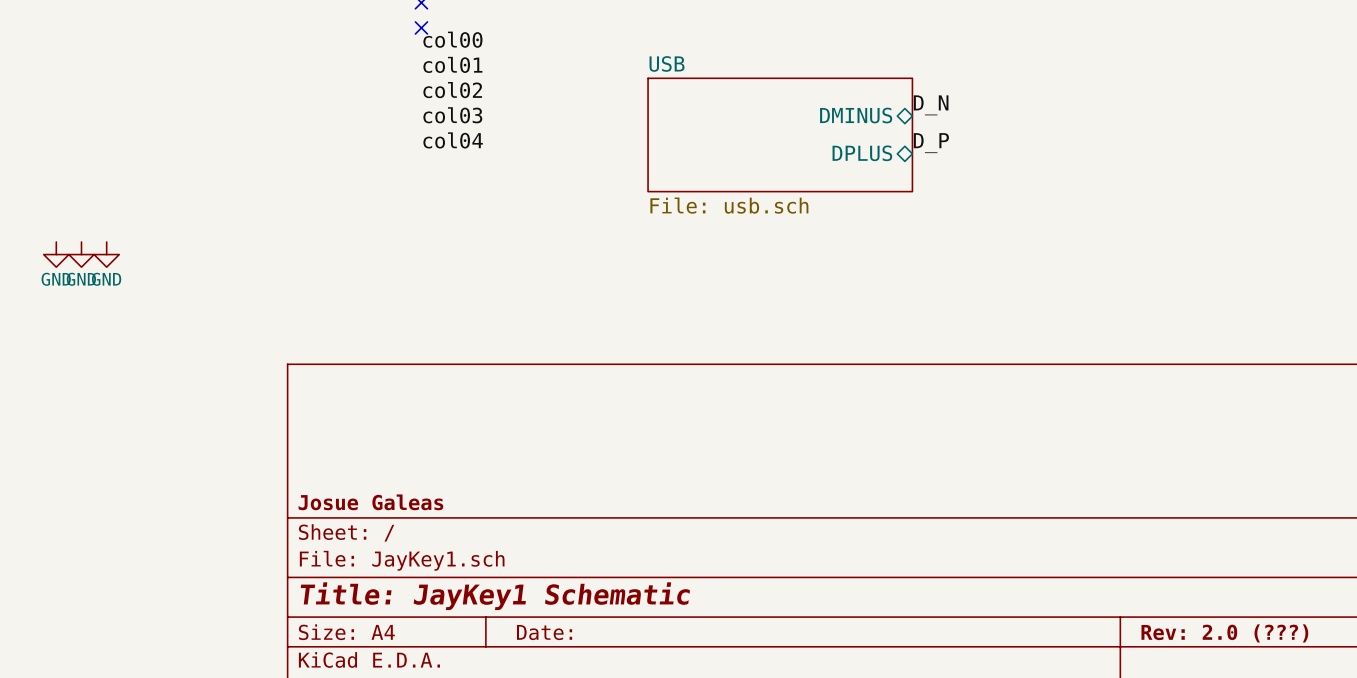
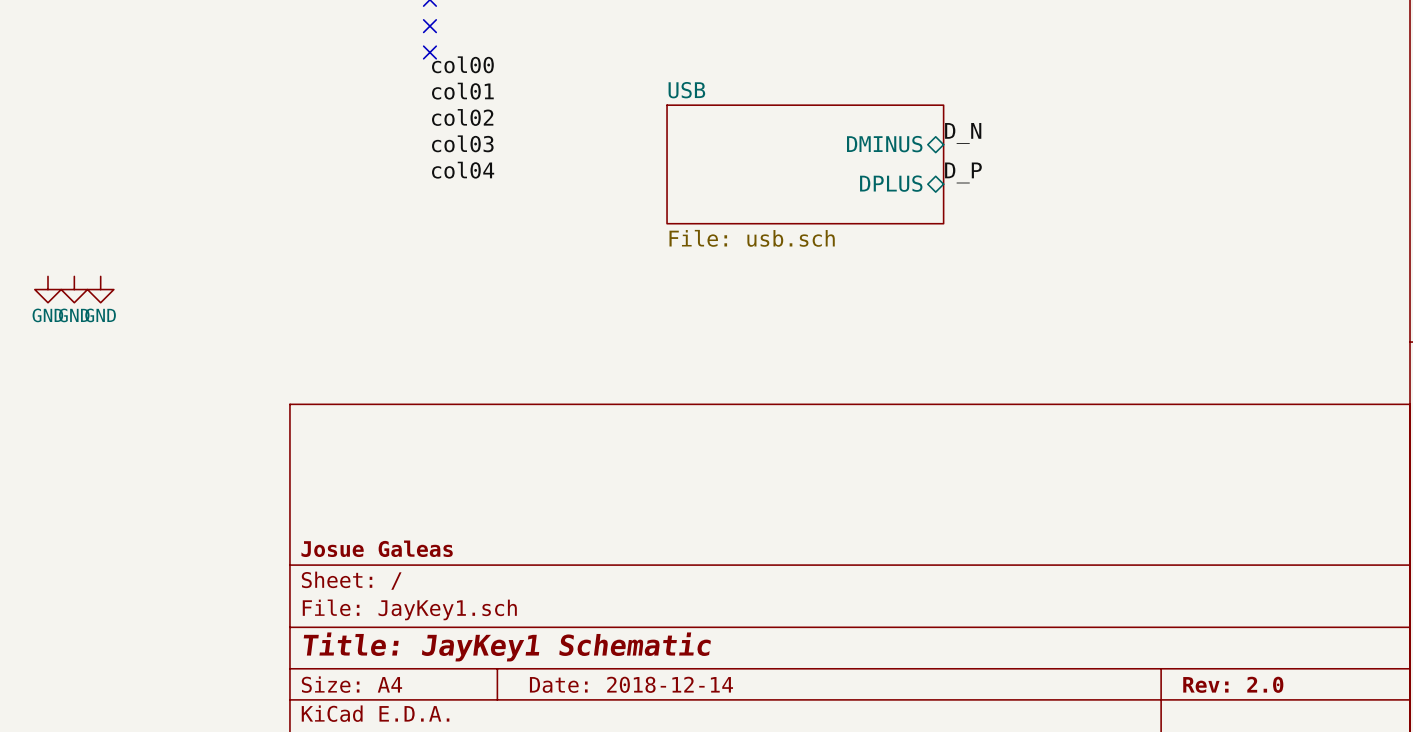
title block: Date: (544, 632) -> Date: 2018-12-14 (631, 684)
title block: Rev: 2.0 (???) (1224, 633) -> Rev: 2.0 (1233, 684)

